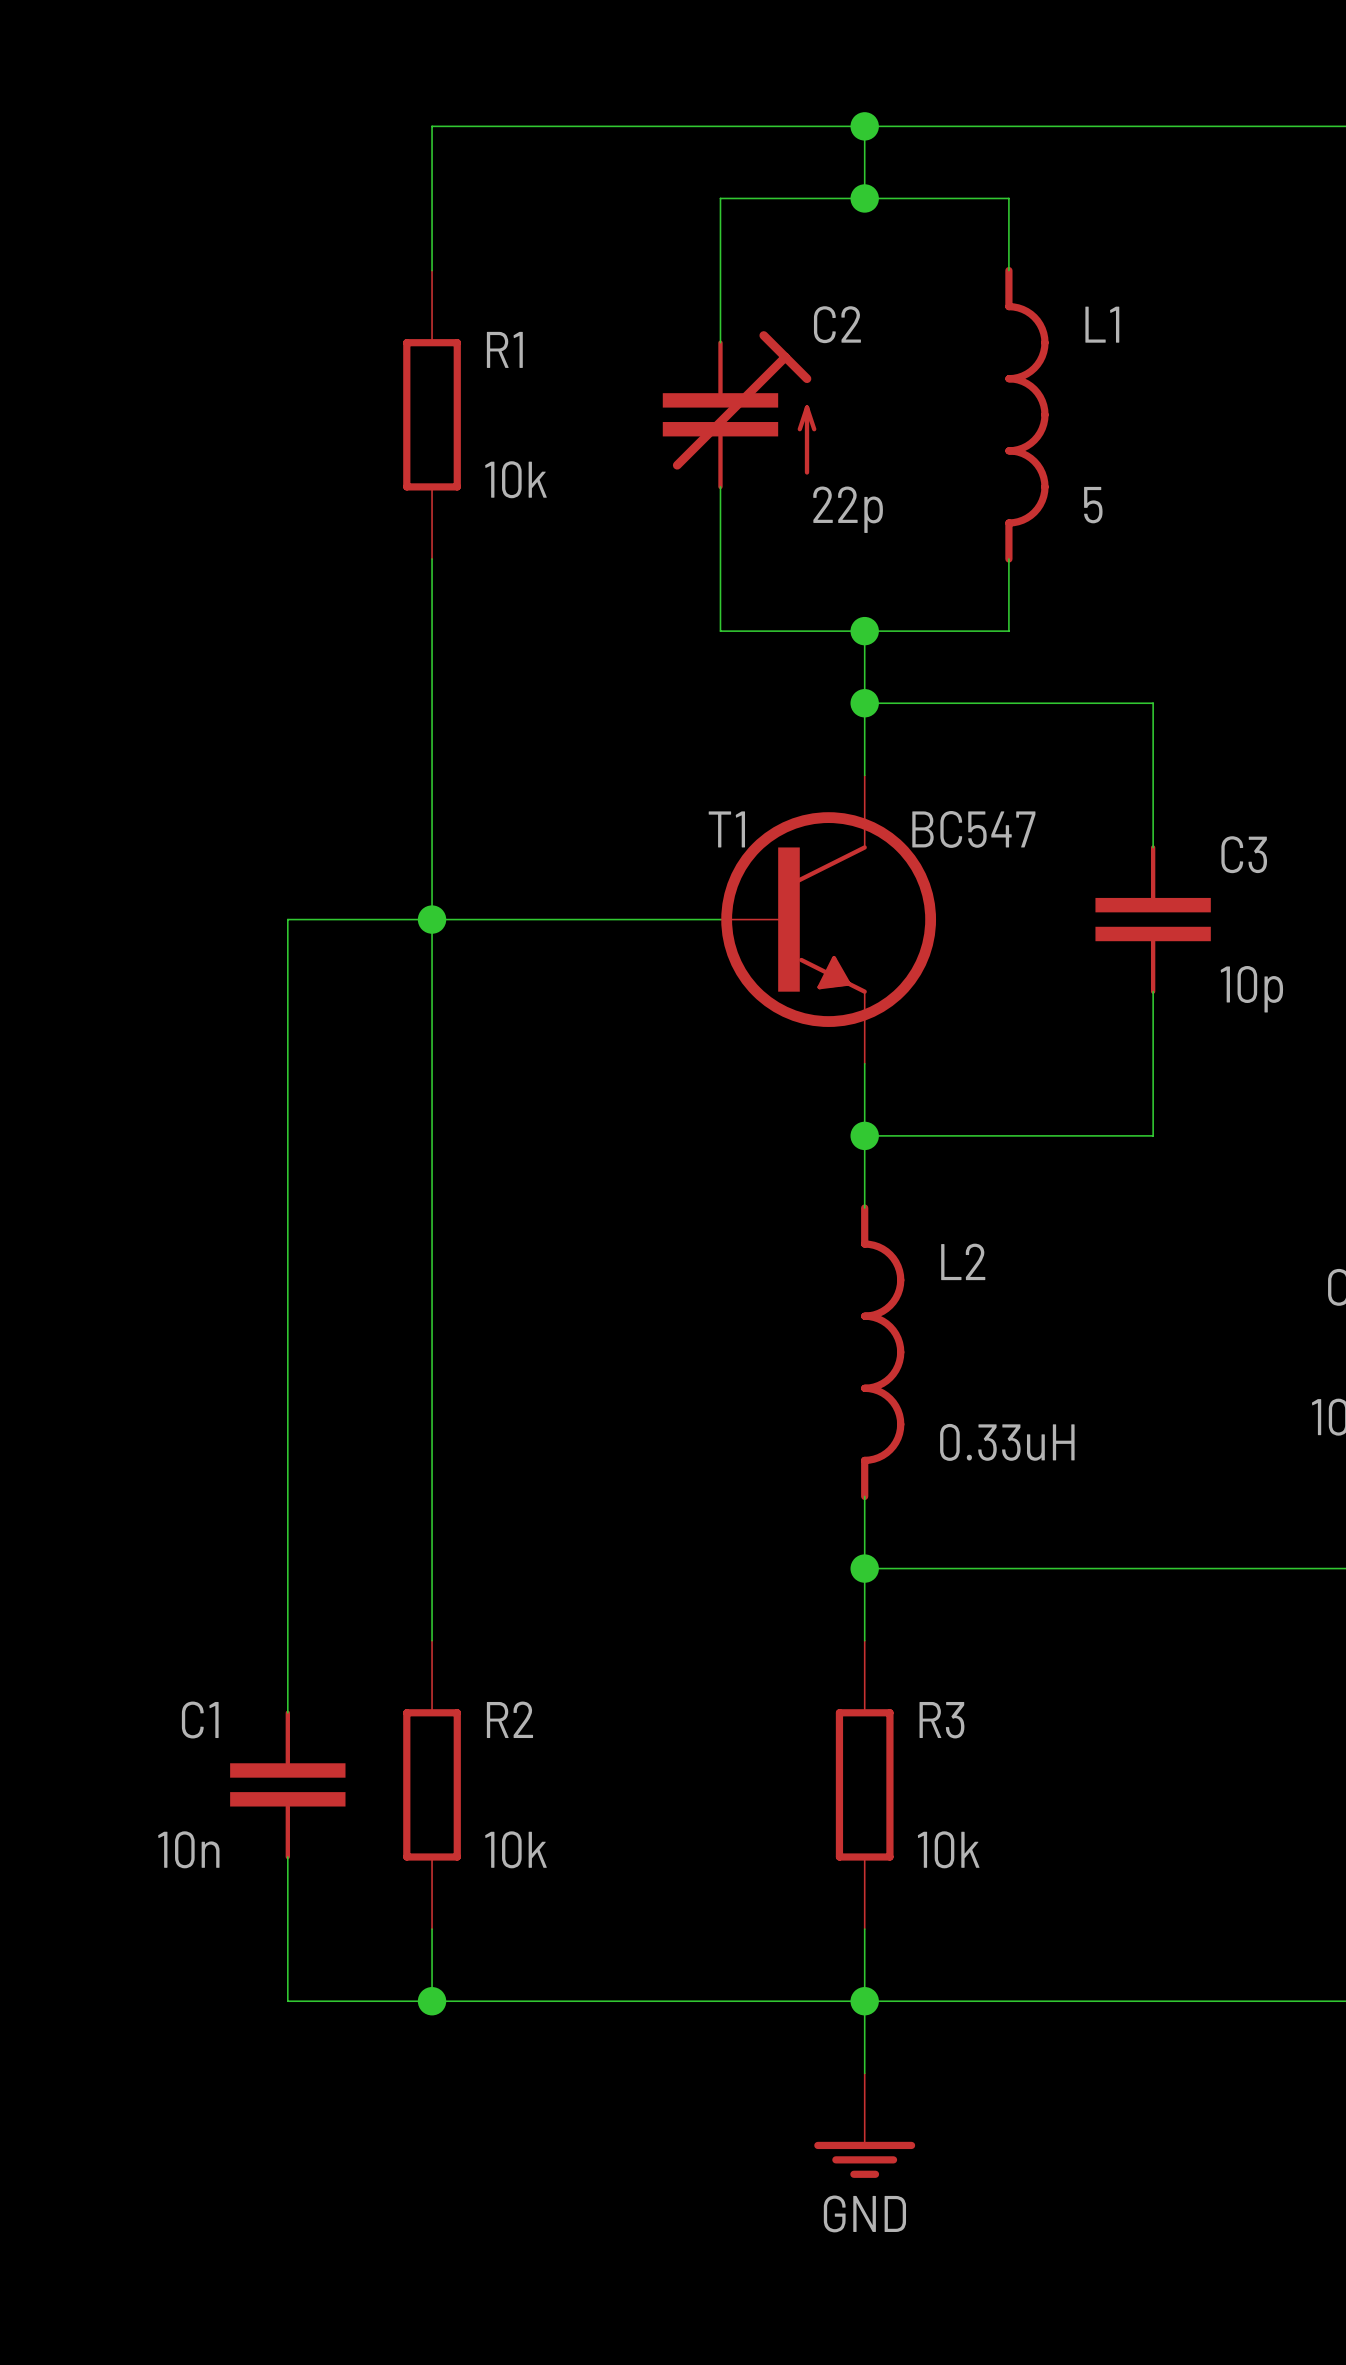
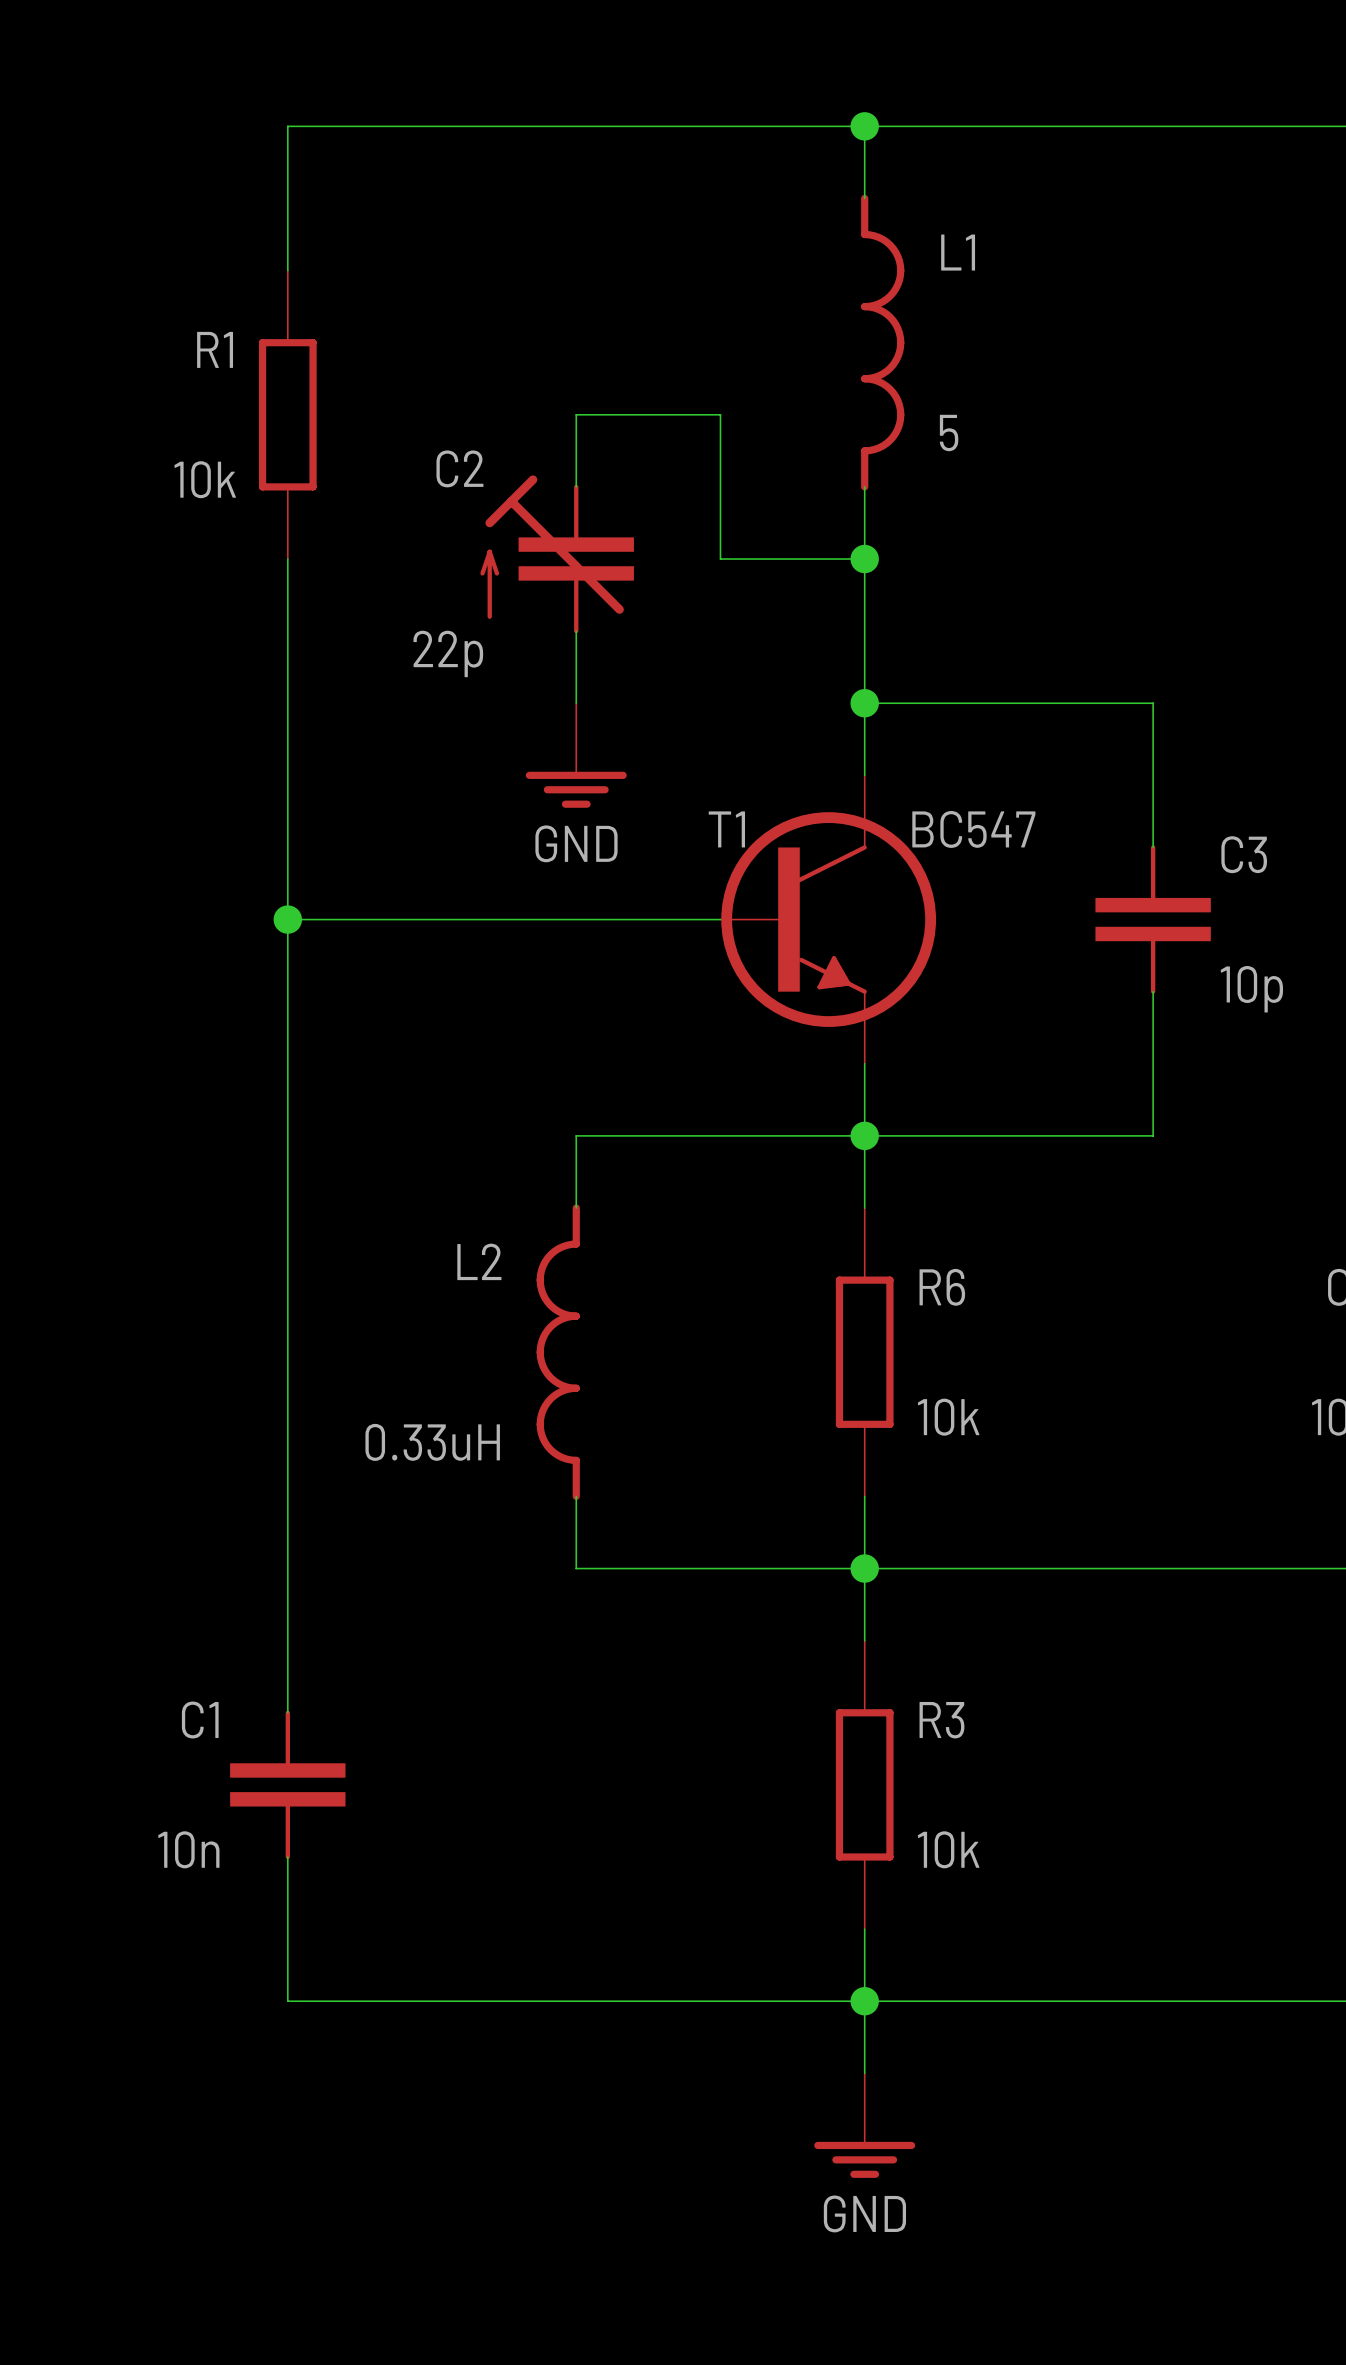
wire: (432, 126) (432, 270) -> (432, 126) (287, 126) (287, 270)
junction: (864, 198) -> none
wire: (1008, 270) (1008, 198) (720, 198) (720, 342) -> none
R1 name position: R1 (504, 349) -> R1 (215, 349)
C2 flip: as is (739, 410) -> left-right (557, 554)
C2 position: (739, 410) -> (557, 554)
R1 position: (432, 414) -> (287, 414)
L1 position: (1026, 414) -> (882, 342)
R1 value position: 10k (515, 479) -> 10k (205, 479)
wire: none -> (576, 486) (576, 414) (720, 414) (720, 486)
wire: none -> (864, 486) (864, 631)
wire: none -> (287, 559) (287, 919)
wire: (432, 559) (432, 1640) -> none
wire: (720, 559) (720, 631) (1008, 631) (1008, 559) -> (720, 559) (864, 559)
wire: none -> (576, 631) (576, 703)
junction position: (864, 631) -> (864, 559)
power symbol: none -> GND (576, 755)
junction position: (432, 919) -> (287, 919)
wire: none -> (864, 1135) (576, 1135) (576, 1208)
L2 name position: L2 (963, 1261) -> L2 (479, 1261)
R6: none -> 10k (864, 1352)
L2 rotation: 0° (882, 1352) -> 180° (558, 1352)
L2 position: (882, 1352) -> (558, 1352)
L2 value position: 0.33uH (1007, 1442) -> 0.33uH (432, 1442)
wire: none -> (576, 1496) (576, 1568) (864, 1568)
R2: 10k (432, 1784) -> none
wire: (432, 1929) (432, 2001) -> none
junction: (432, 2001) -> none

